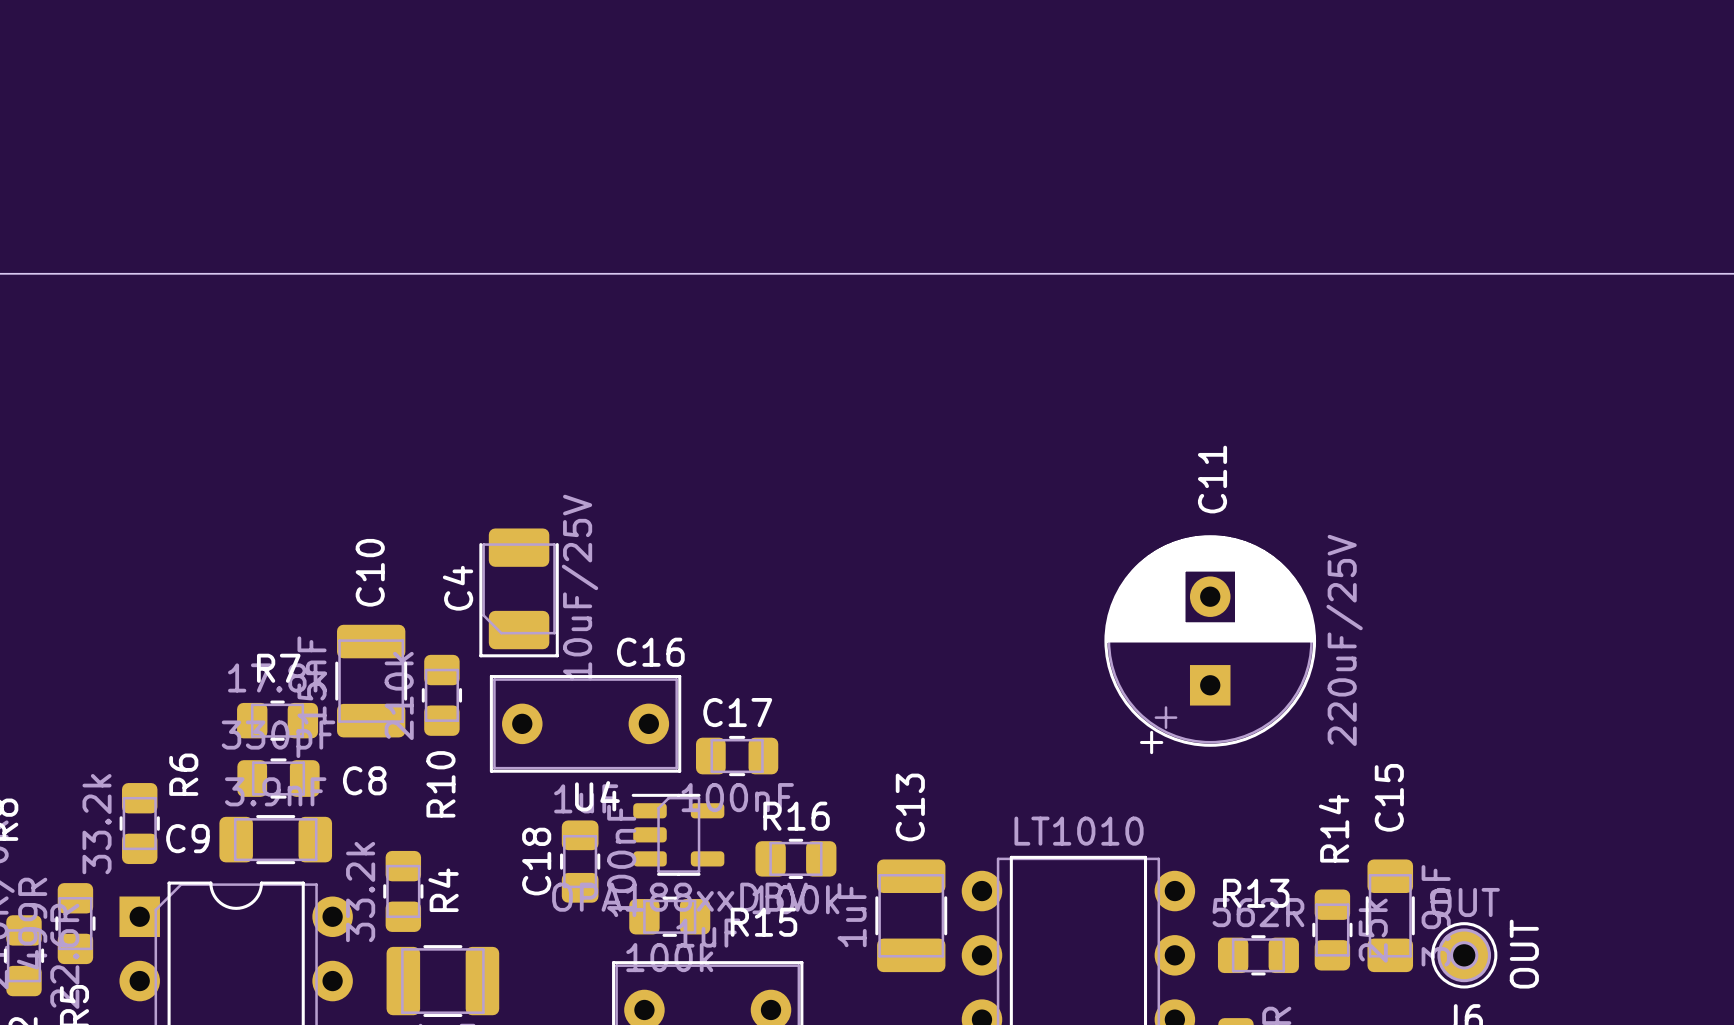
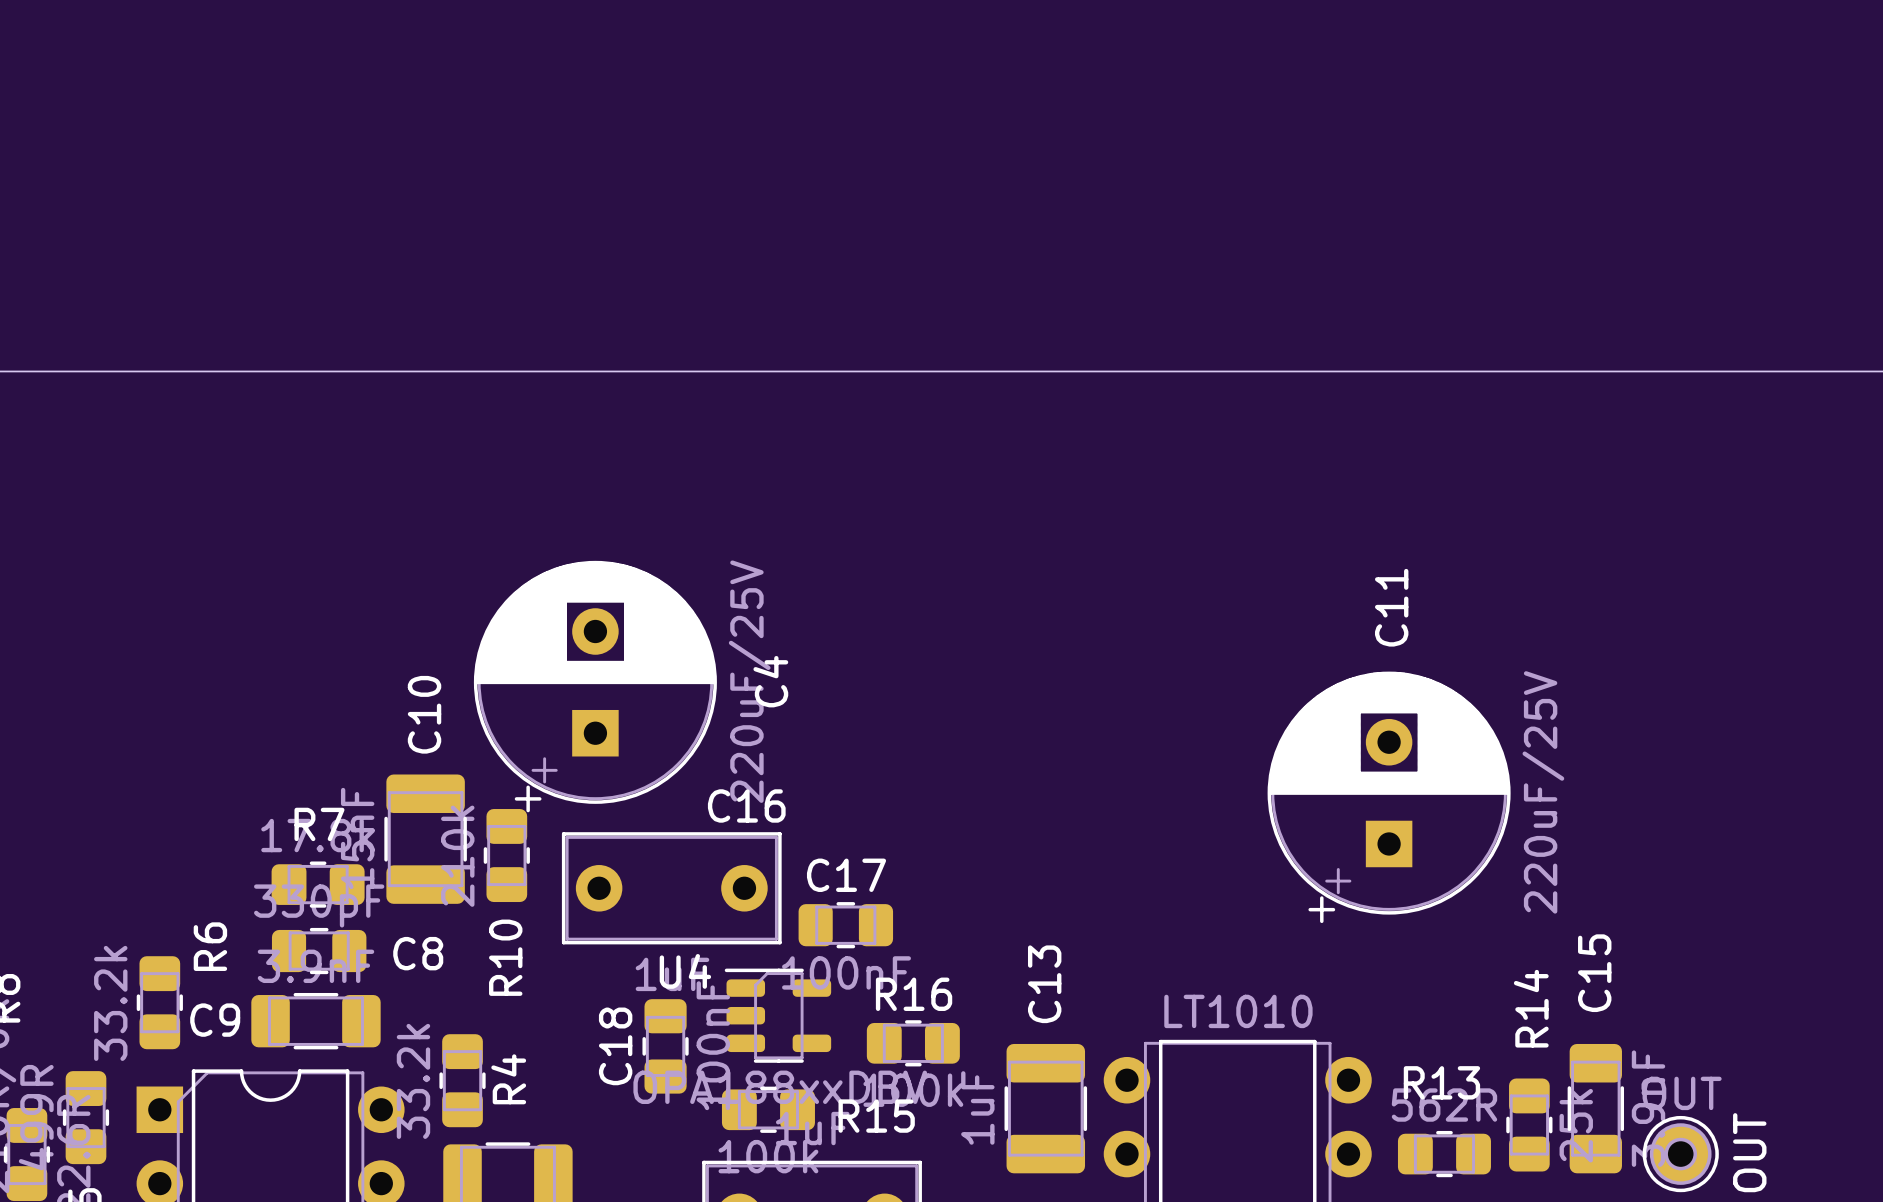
C4 footprint: [479, 528, 559, 658] -> [473, 560, 717, 813]
C4 value: 10uF/25V (580, 587) -> 220uF/25V (749, 681)
C4 name position: C4 (458, 588) -> C4 (770, 681)

